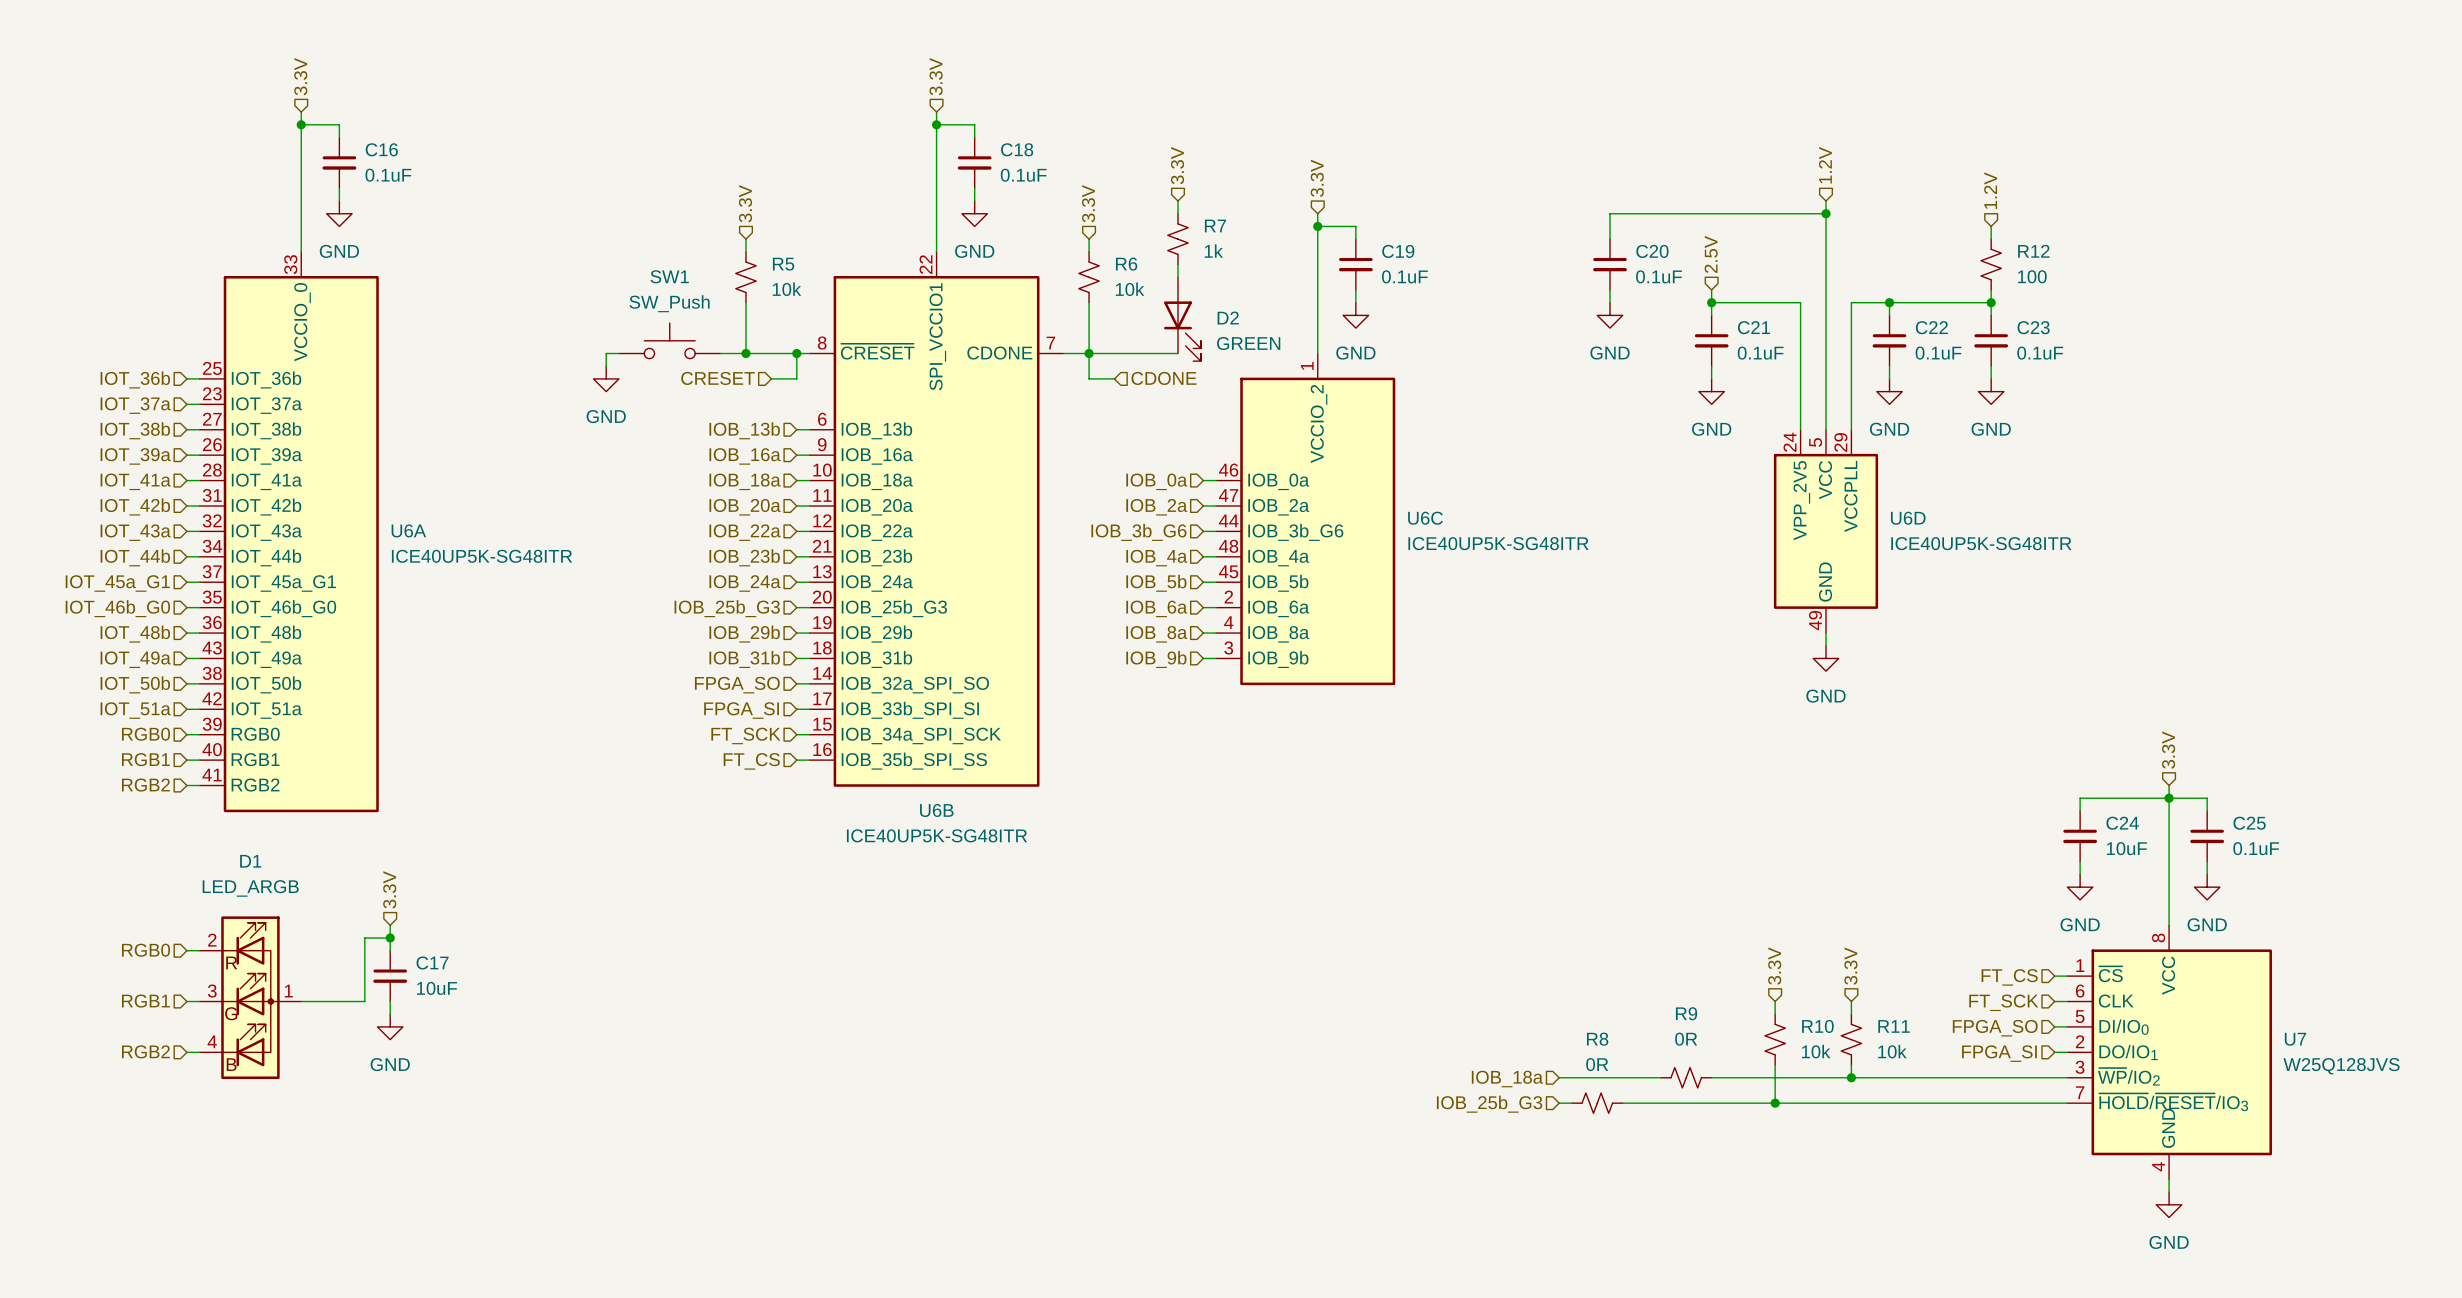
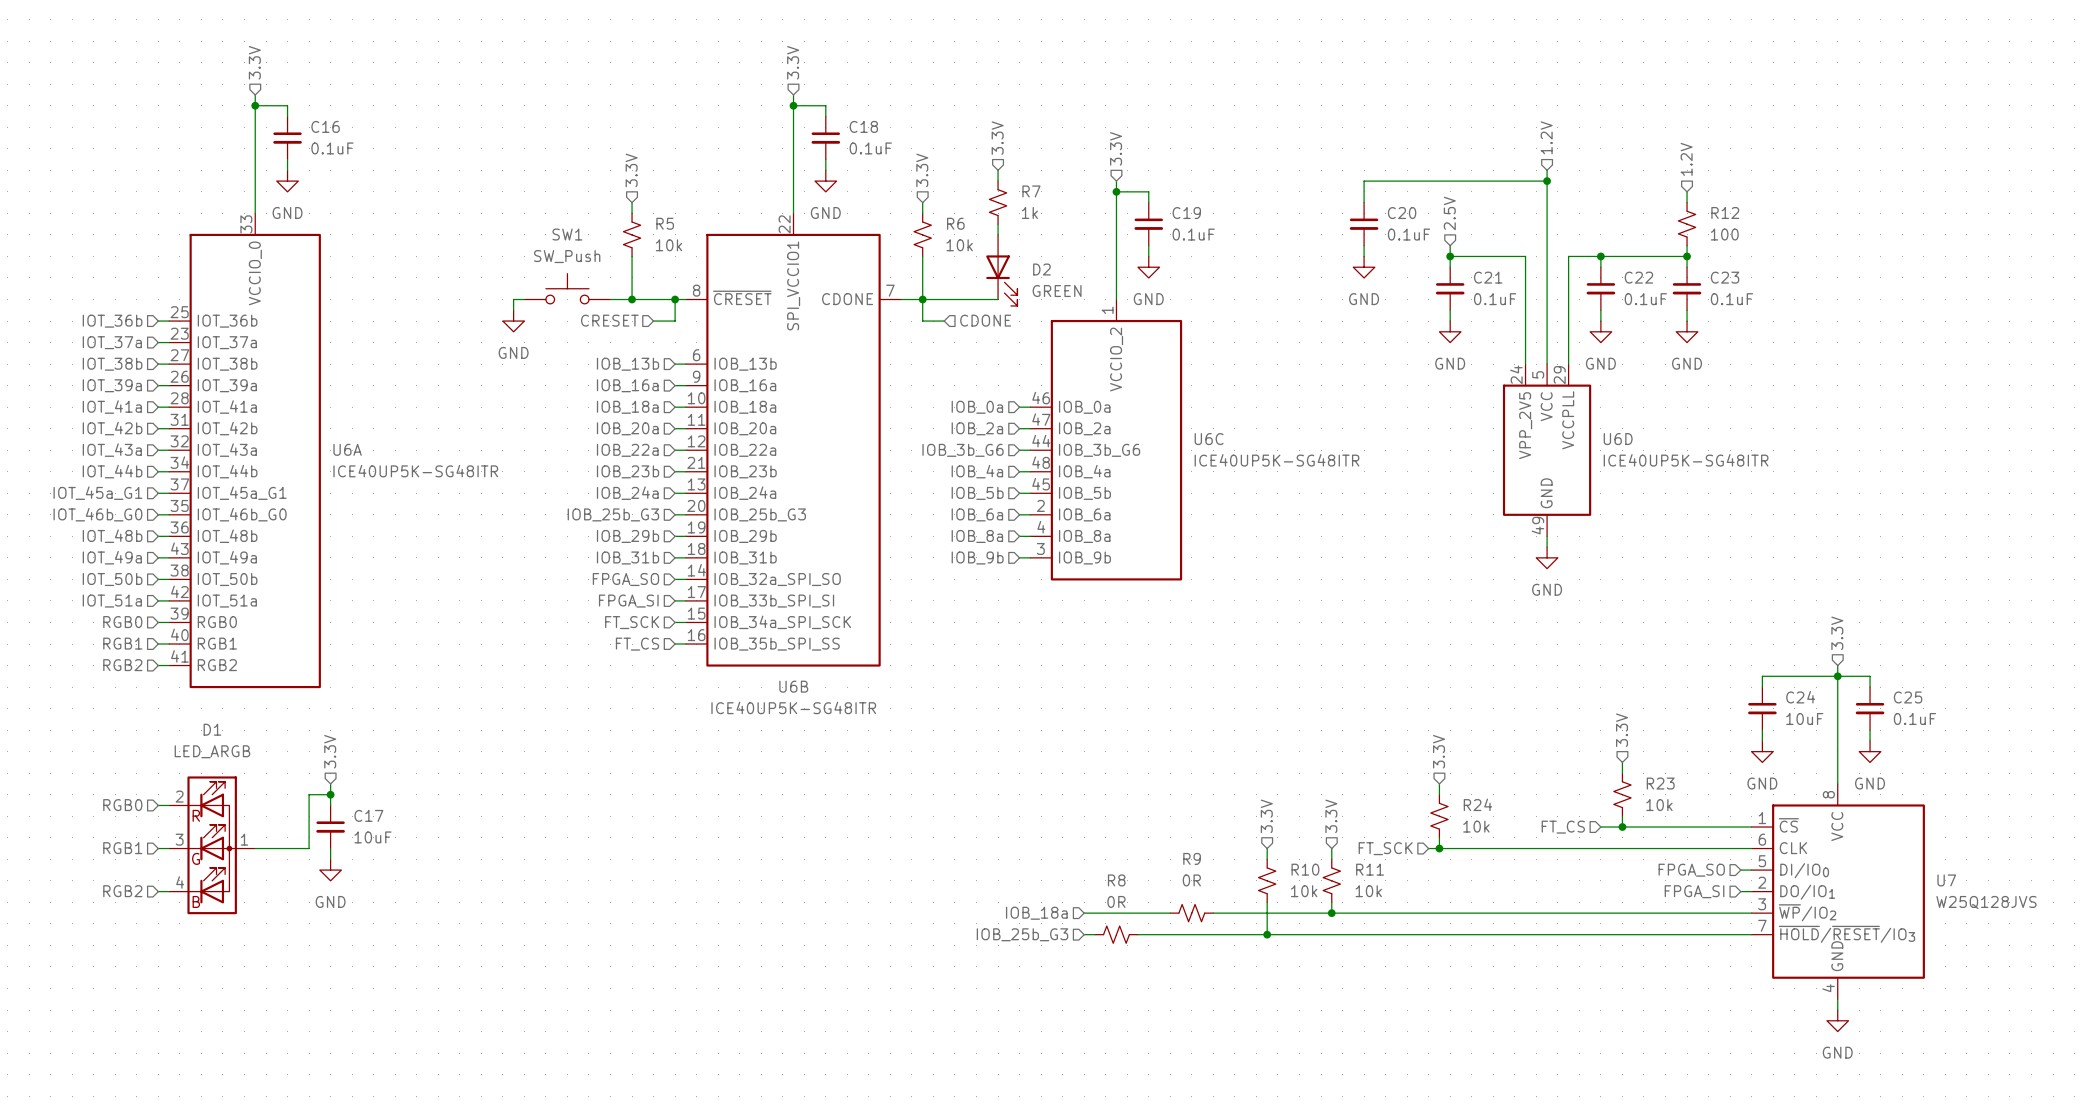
hierarchical label: none -> 3.3V (1622, 730)
hierarchical label: none -> 3.3V (1439, 751)
wire: none -> (1439, 783) (1439, 794)
R23: none -> 10k (1622, 794)
R24: none -> 10k (1439, 816)
hierarchical label: none -> 3.3V (1266, 816)
hierarchical label: none -> 3.3V (1331, 816)
hierarchical label: 3.3V (1774, 966) -> none
hierarchical label: 3.3V (1850, 966) -> none
wire: none -> (1600, 827) (1740, 827)
junction: none -> (1622, 827)
hierarchical label position: FT_CS (2009, 977) -> FT_CS (1563, 827)
wire: none -> (1267, 848) (1267, 859)
wire: none -> (1331, 848) (1331, 859)
wire: none -> (1428, 848) (1740, 848)
junction: none -> (1439, 848)
wire: (1775, 1001) (1775, 1014) -> (1439, 837) (1439, 848)
wire: (1851, 1001) (1851, 1014) -> (1622, 762) (1622, 773)
hierarchical label: none -> FT_SCK (1385, 848)
hierarchical label: FT_SCK (2003, 1002) -> none
R10 position: (1775, 1039) -> (1267, 880)
R11 position: (1851, 1039) -> (1331, 880)
wire: none -> (1267, 902) (1267, 934)
wire: none -> (1331, 902) (1331, 913)
wire: (1775, 1065) (1775, 1103) -> none
wire: (1851, 1065) (1851, 1077) -> (1622, 816) (1622, 827)
wire: none -> (1084, 913) (1170, 913)
wire: none -> (1213, 913) (1321, 913)
junction: none -> (1331, 913)
R9 position: (1686, 1077) -> (1191, 913)
junction: (1851, 1077) -> none
hierarchical label: none -> IOB_18a (1036, 913)
hierarchical label: IOB_18a (1507, 1079) -> none
wire: none -> (1084, 934) (1094, 934)
wire: none -> (1137, 934) (1321, 934)
junction: none -> (1267, 934)
R8 position: (1597, 1103) -> (1116, 934)
junction: (1775, 1103) -> none
hierarchical label: none -> IOB_25b_G3 (1022, 934)
hierarchical label: IOB_25b_G3 (1489, 1104) -> none

